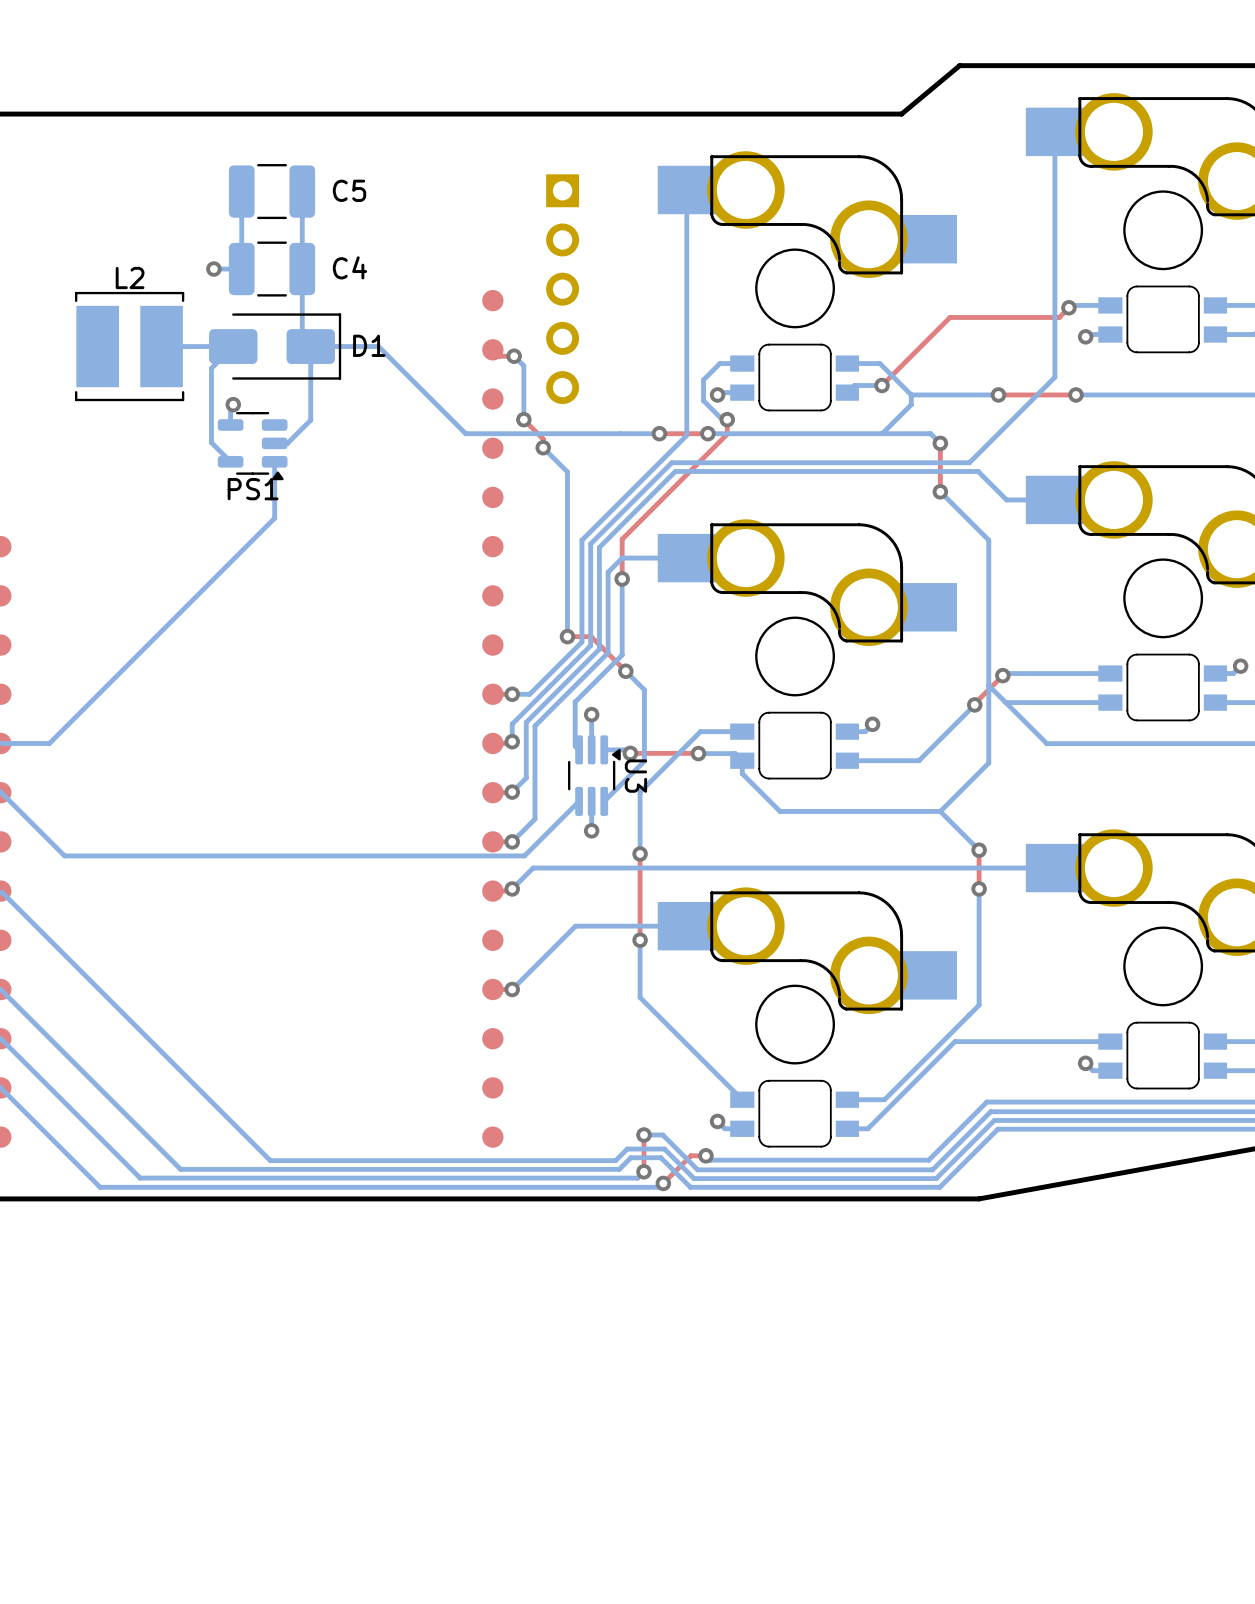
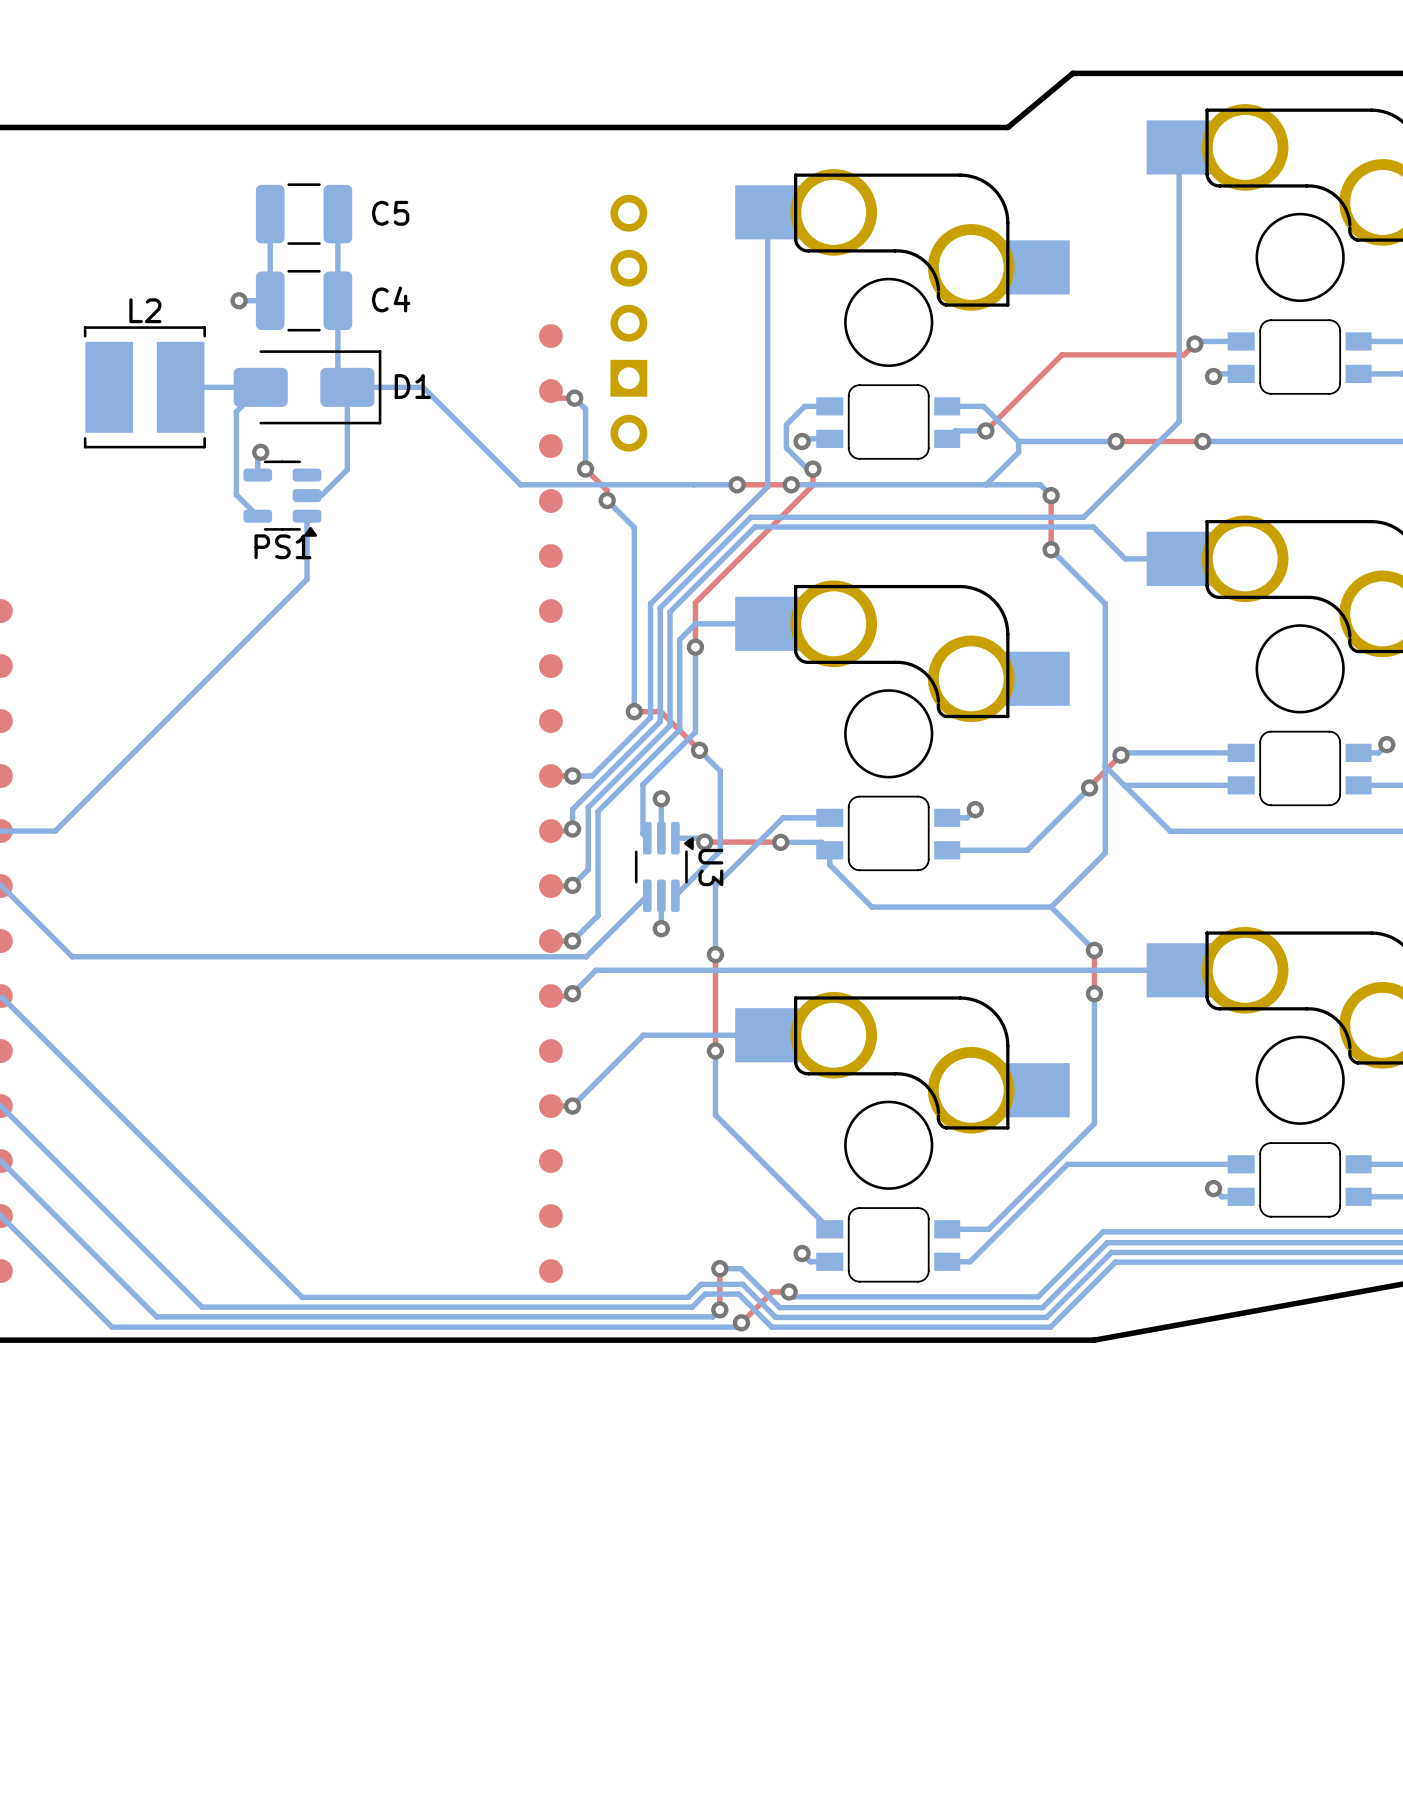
part footprint: [546, 174, 580, 405] -> [610, 194, 648, 452]

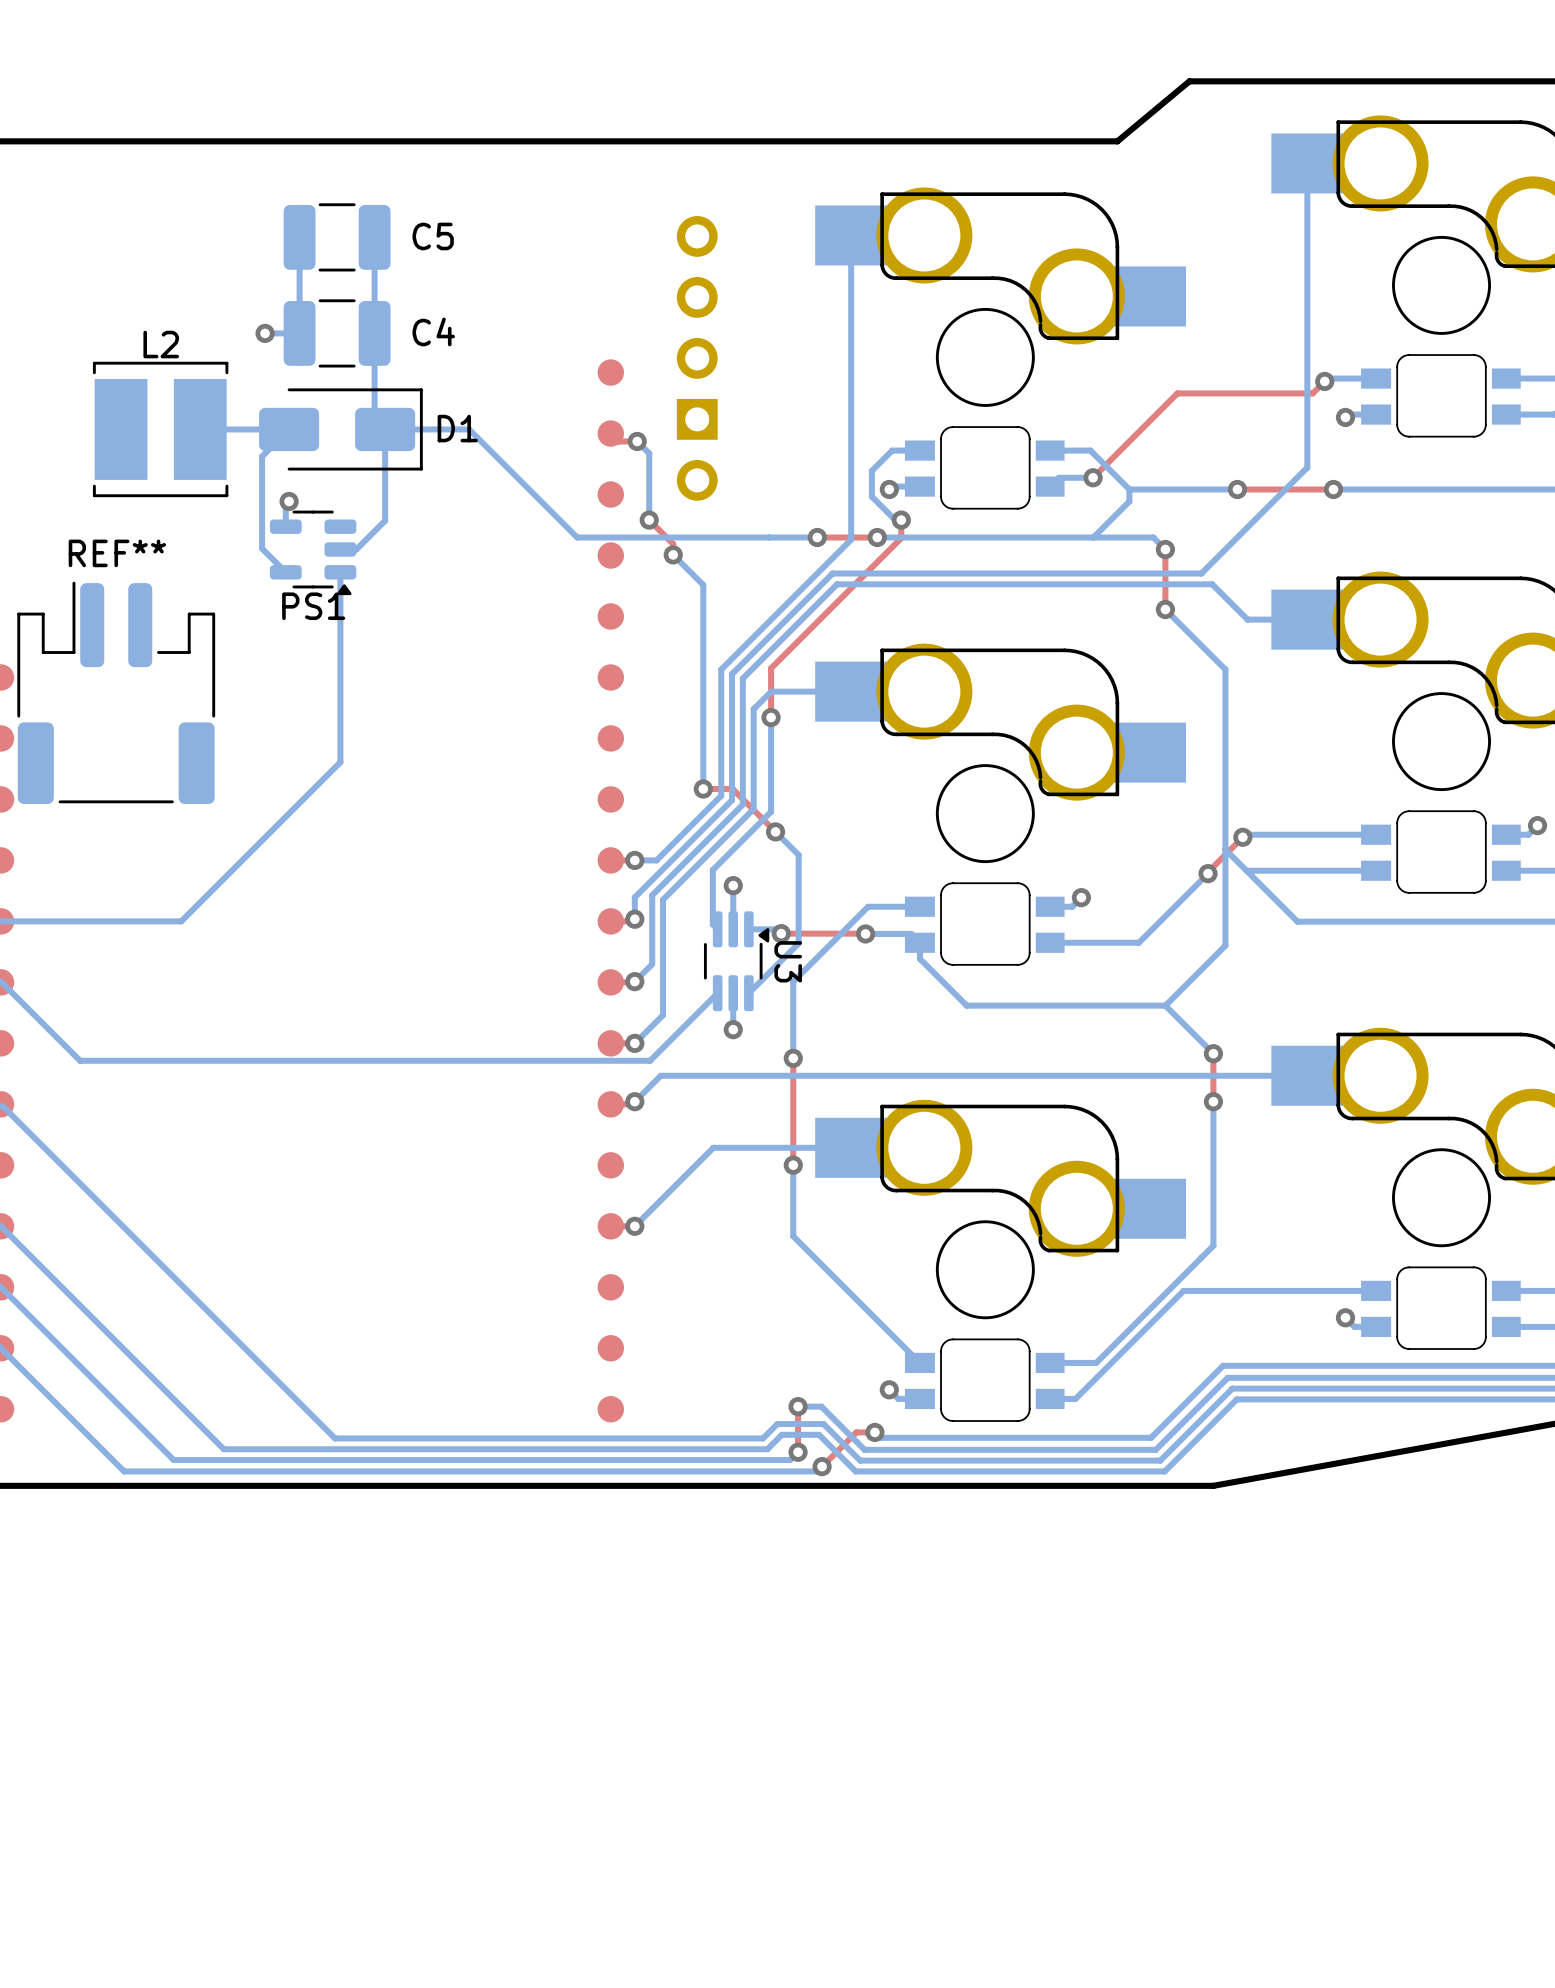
bottom track: (307, 579) (55, 831) -> (340, 642) (340, 762) (181, 921) (61, 921)
REF**: none -> (116, 692)

